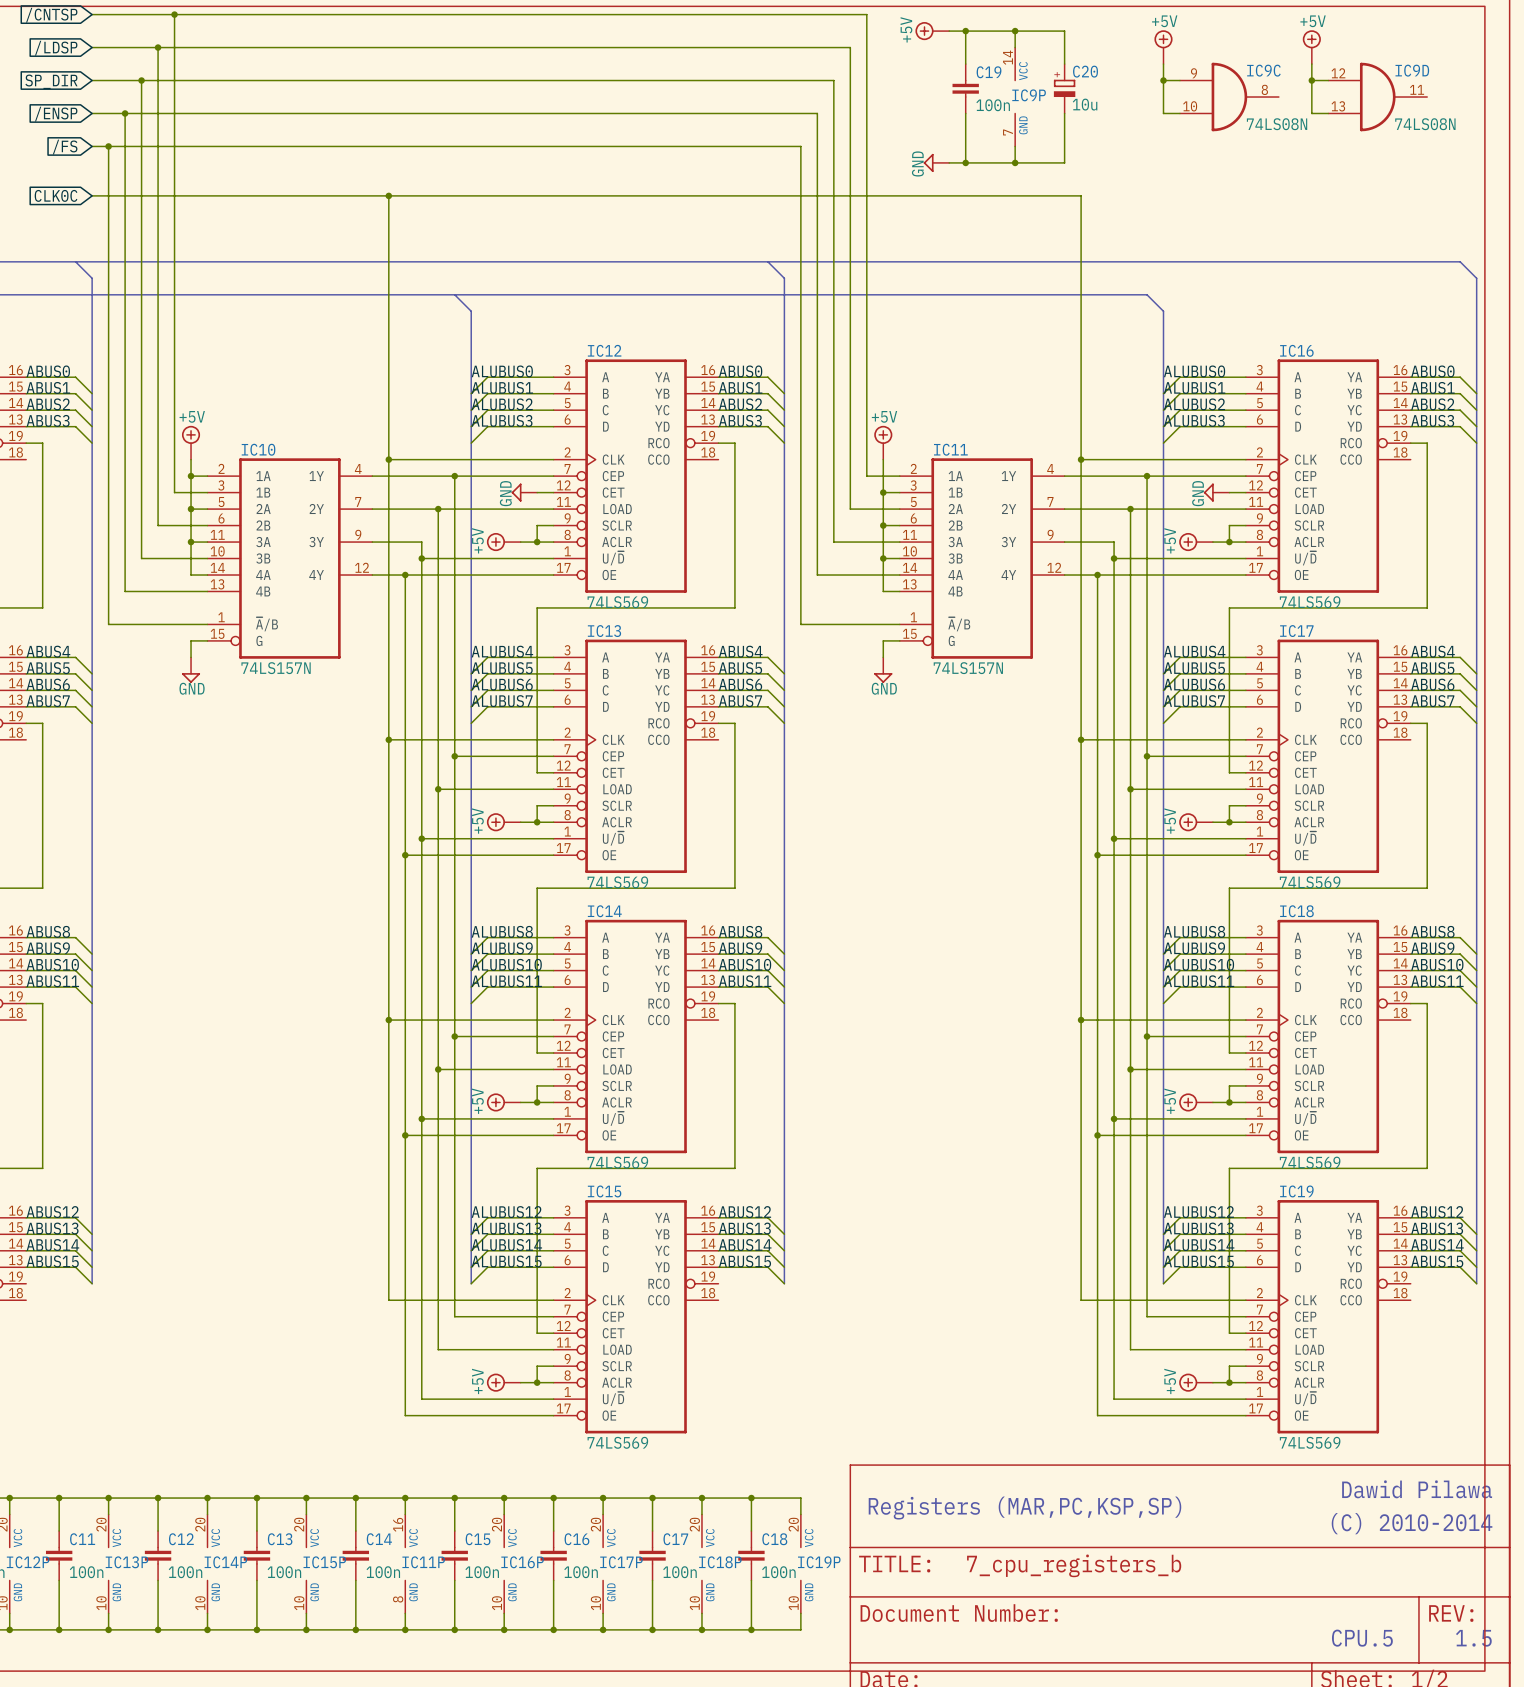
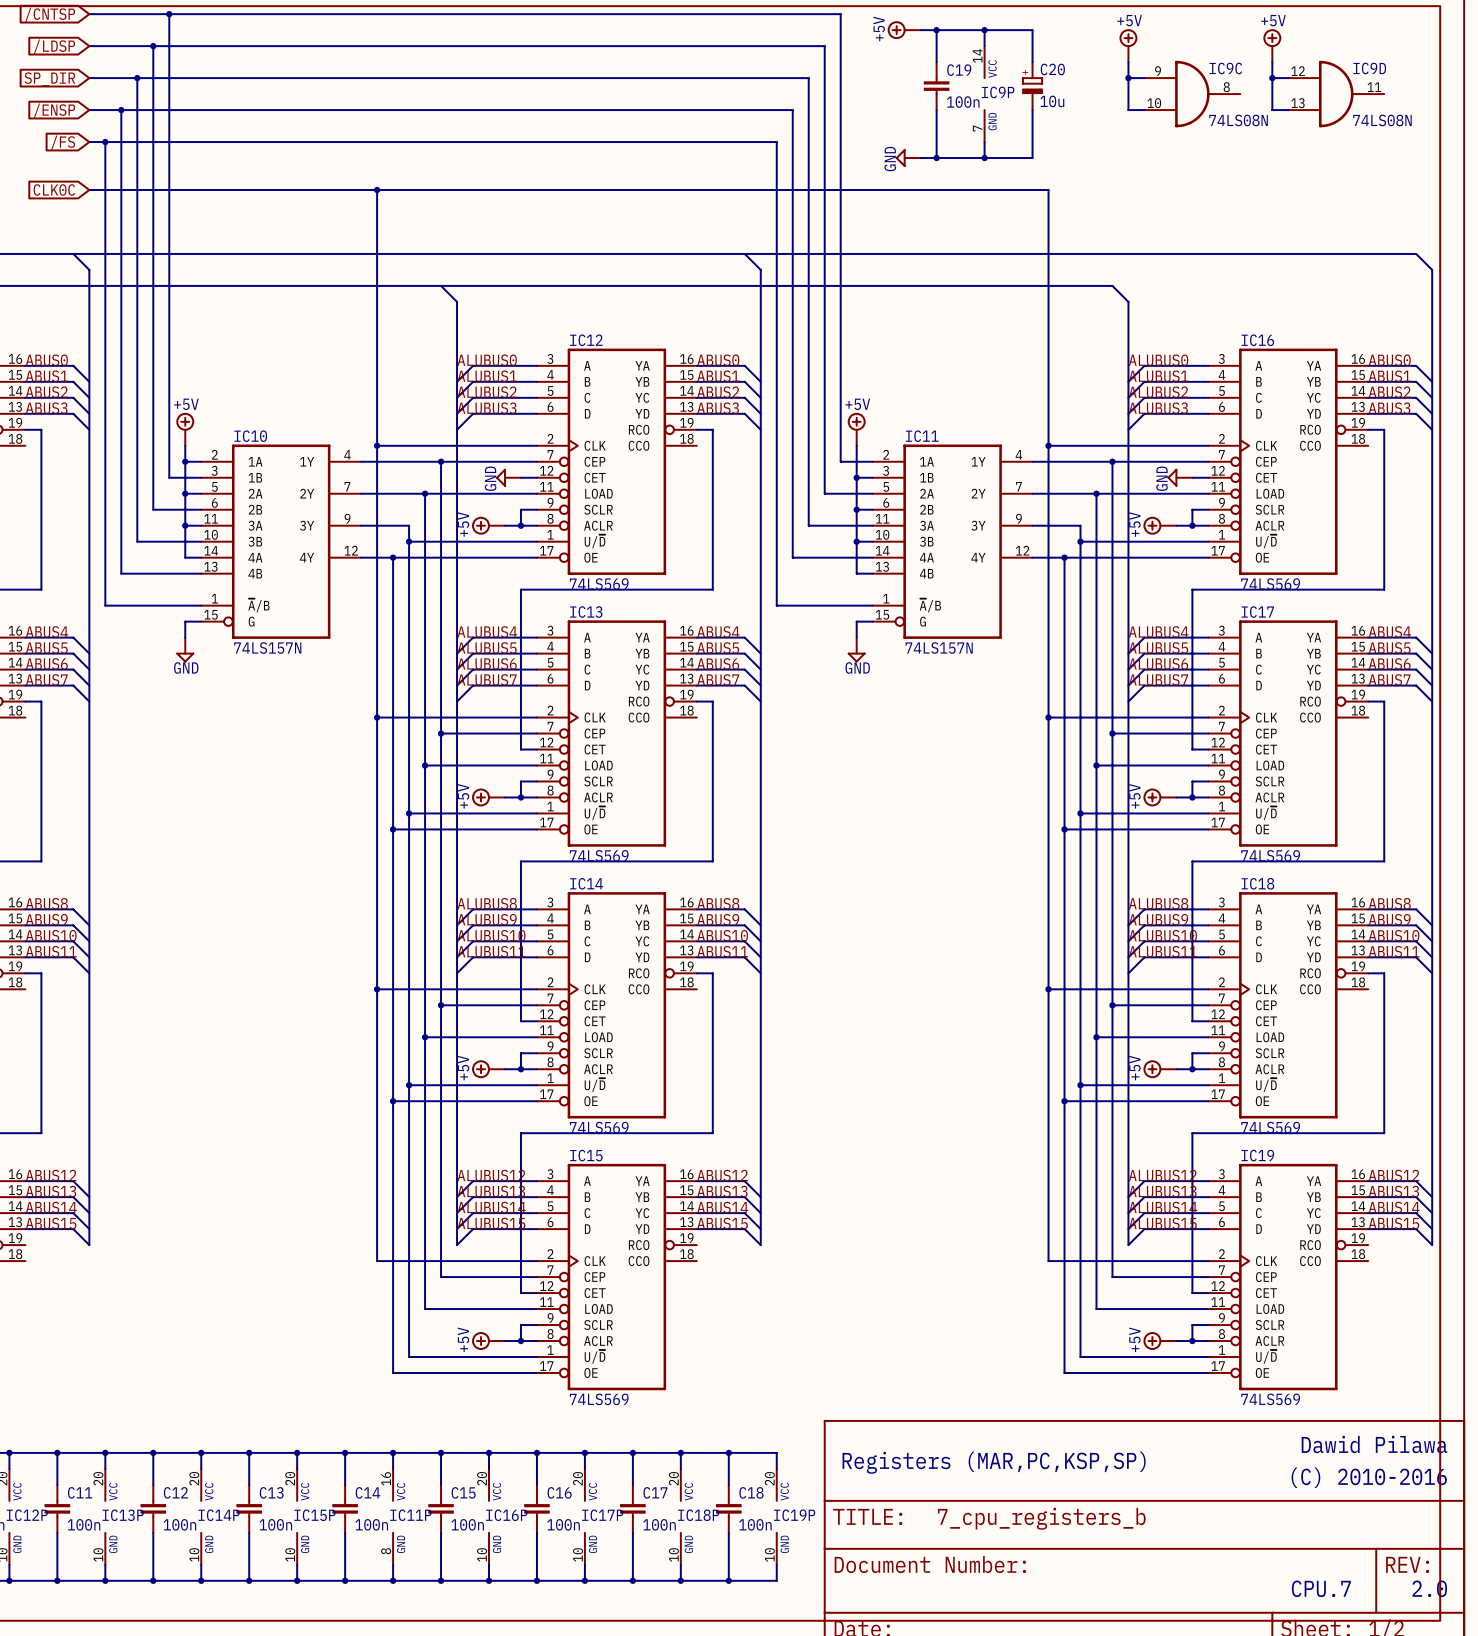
text: (C) 2010-2014 (1412, 1523) -> (C) 2010-2016 (1369, 1477)
text: CPU.5 (1362, 1638) -> CPU.7 (1321, 1588)
text: 1.5 (1473, 1638) -> 2.0 (1429, 1588)

